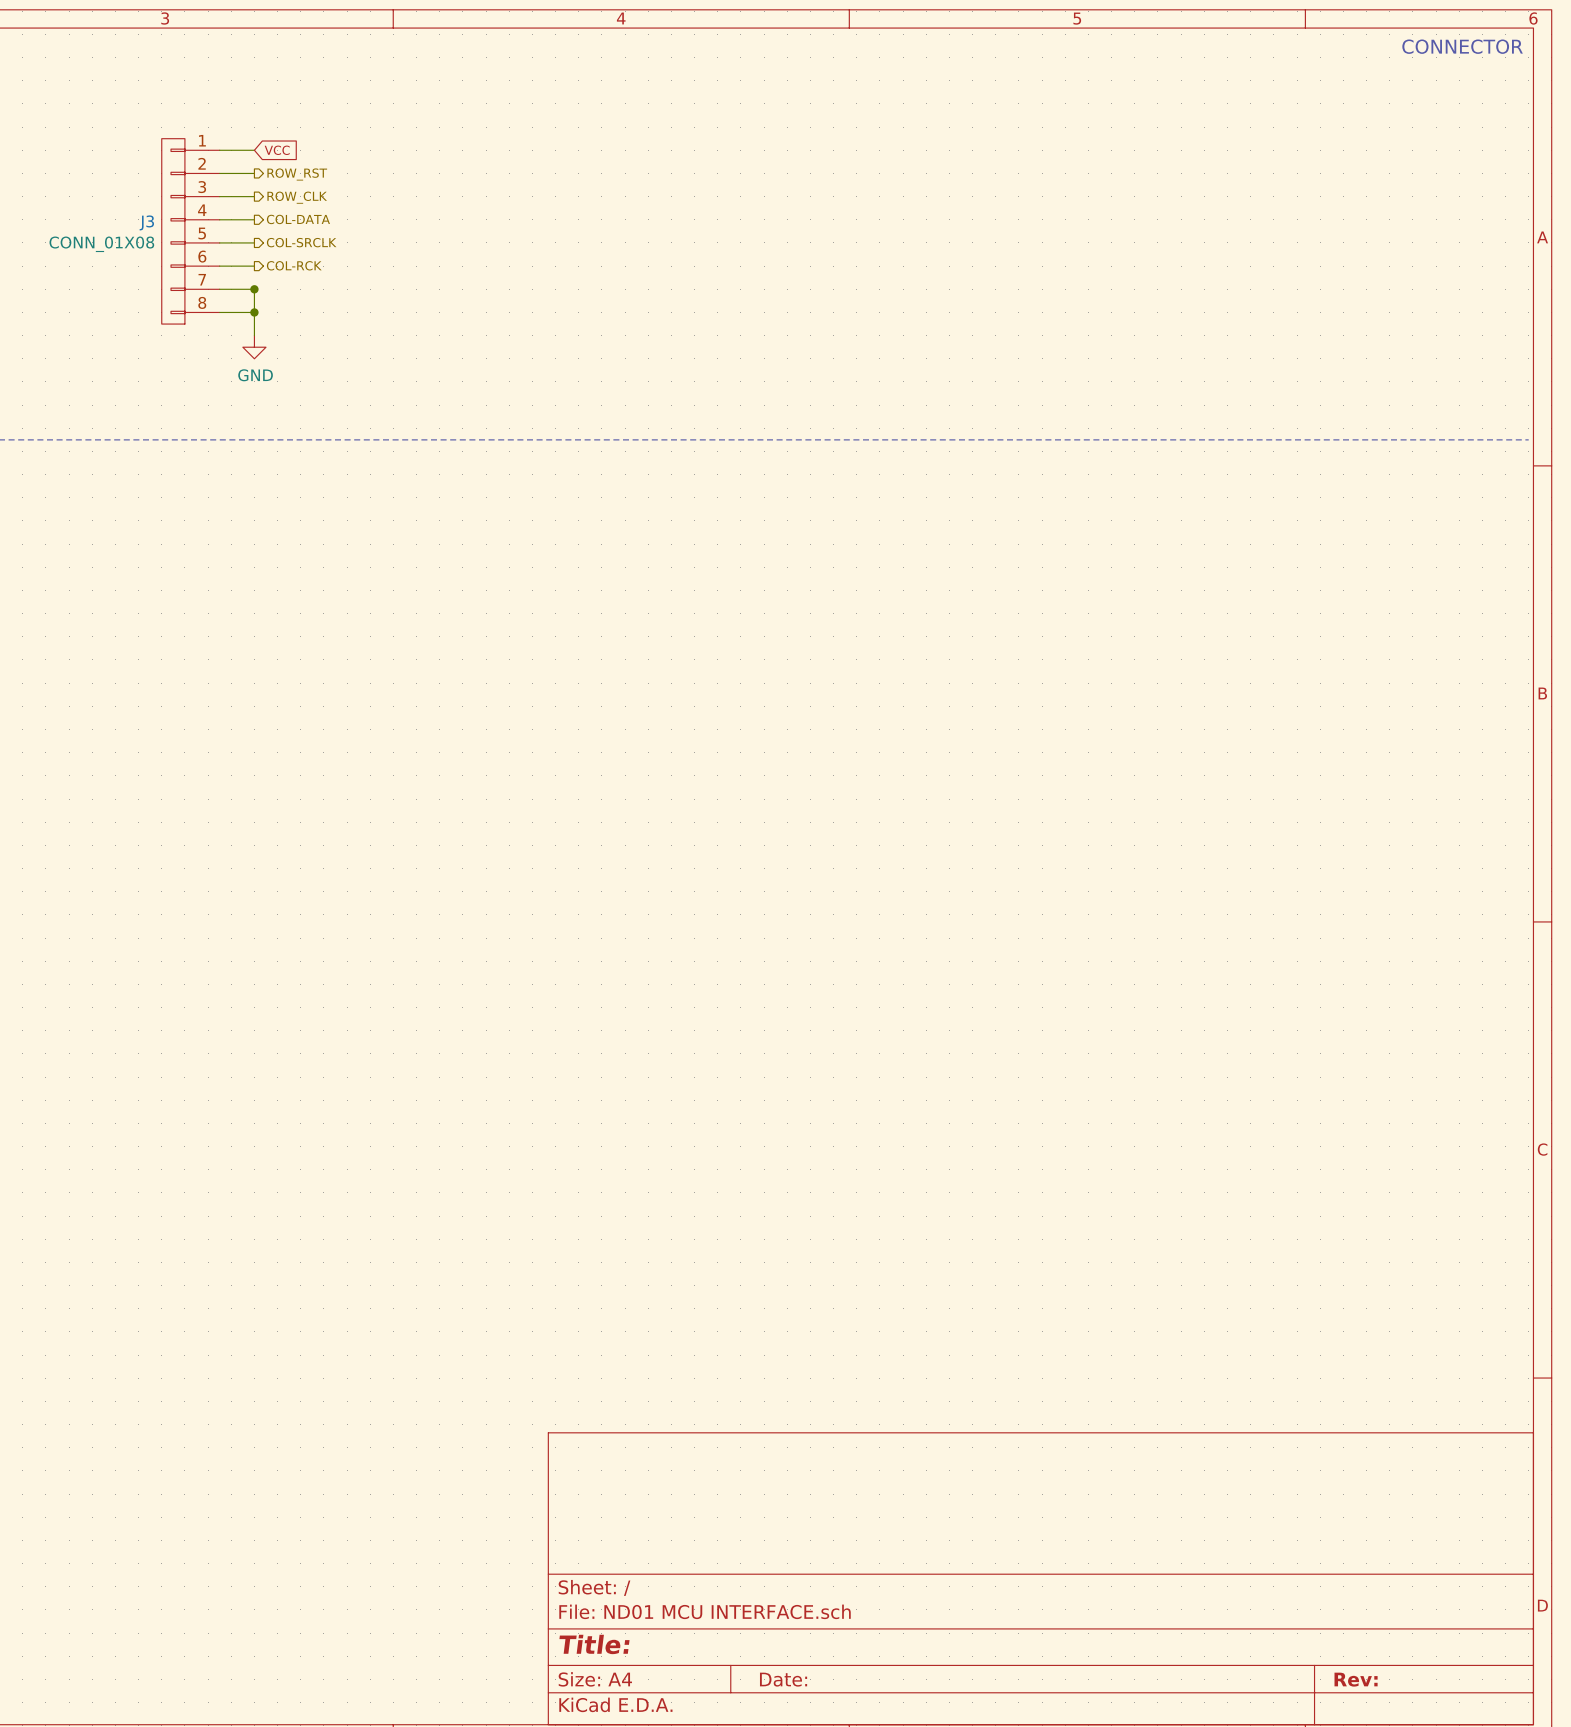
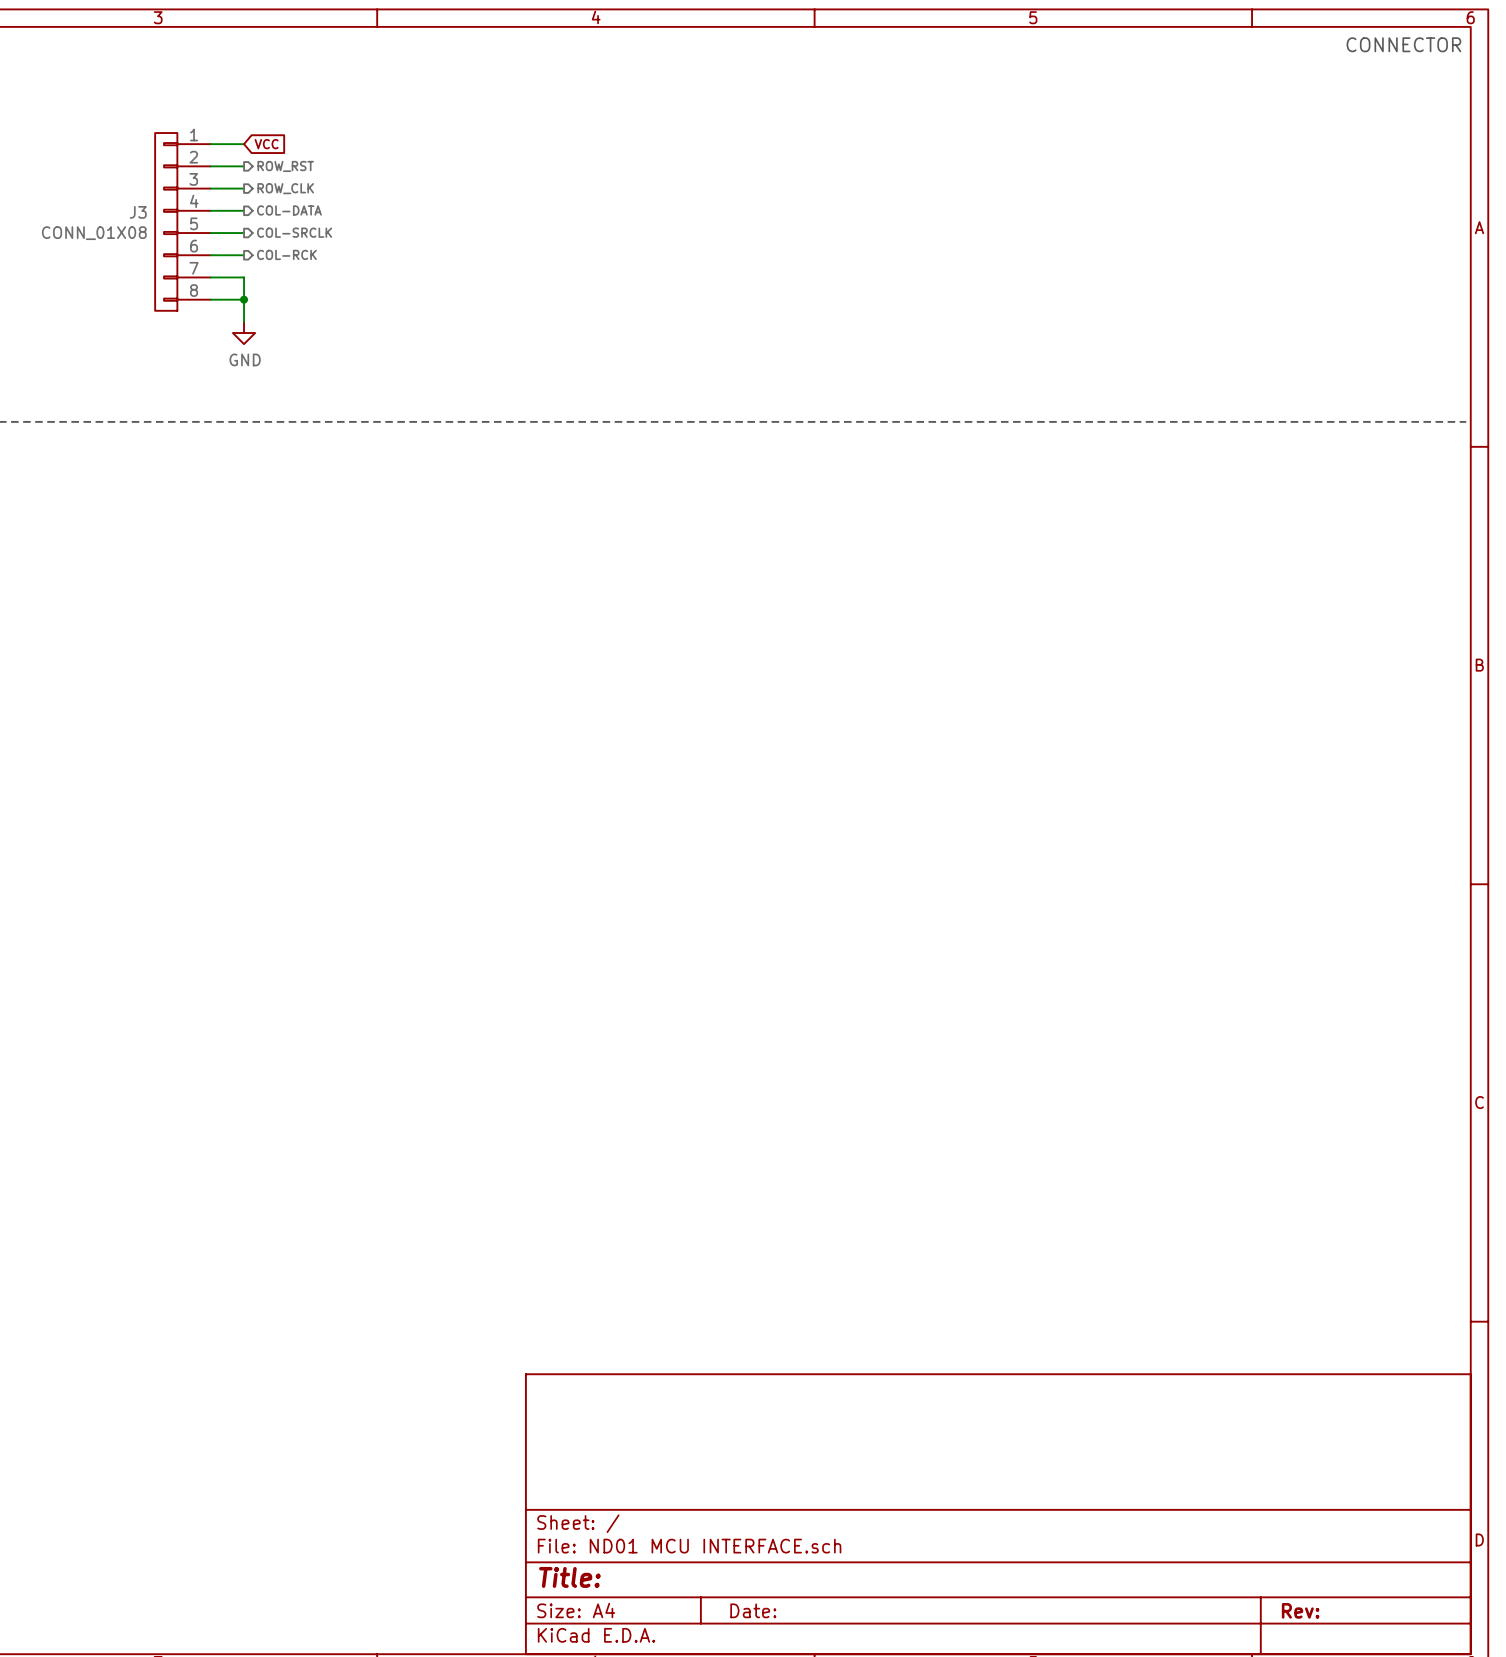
junction: (254, 289) -> none

